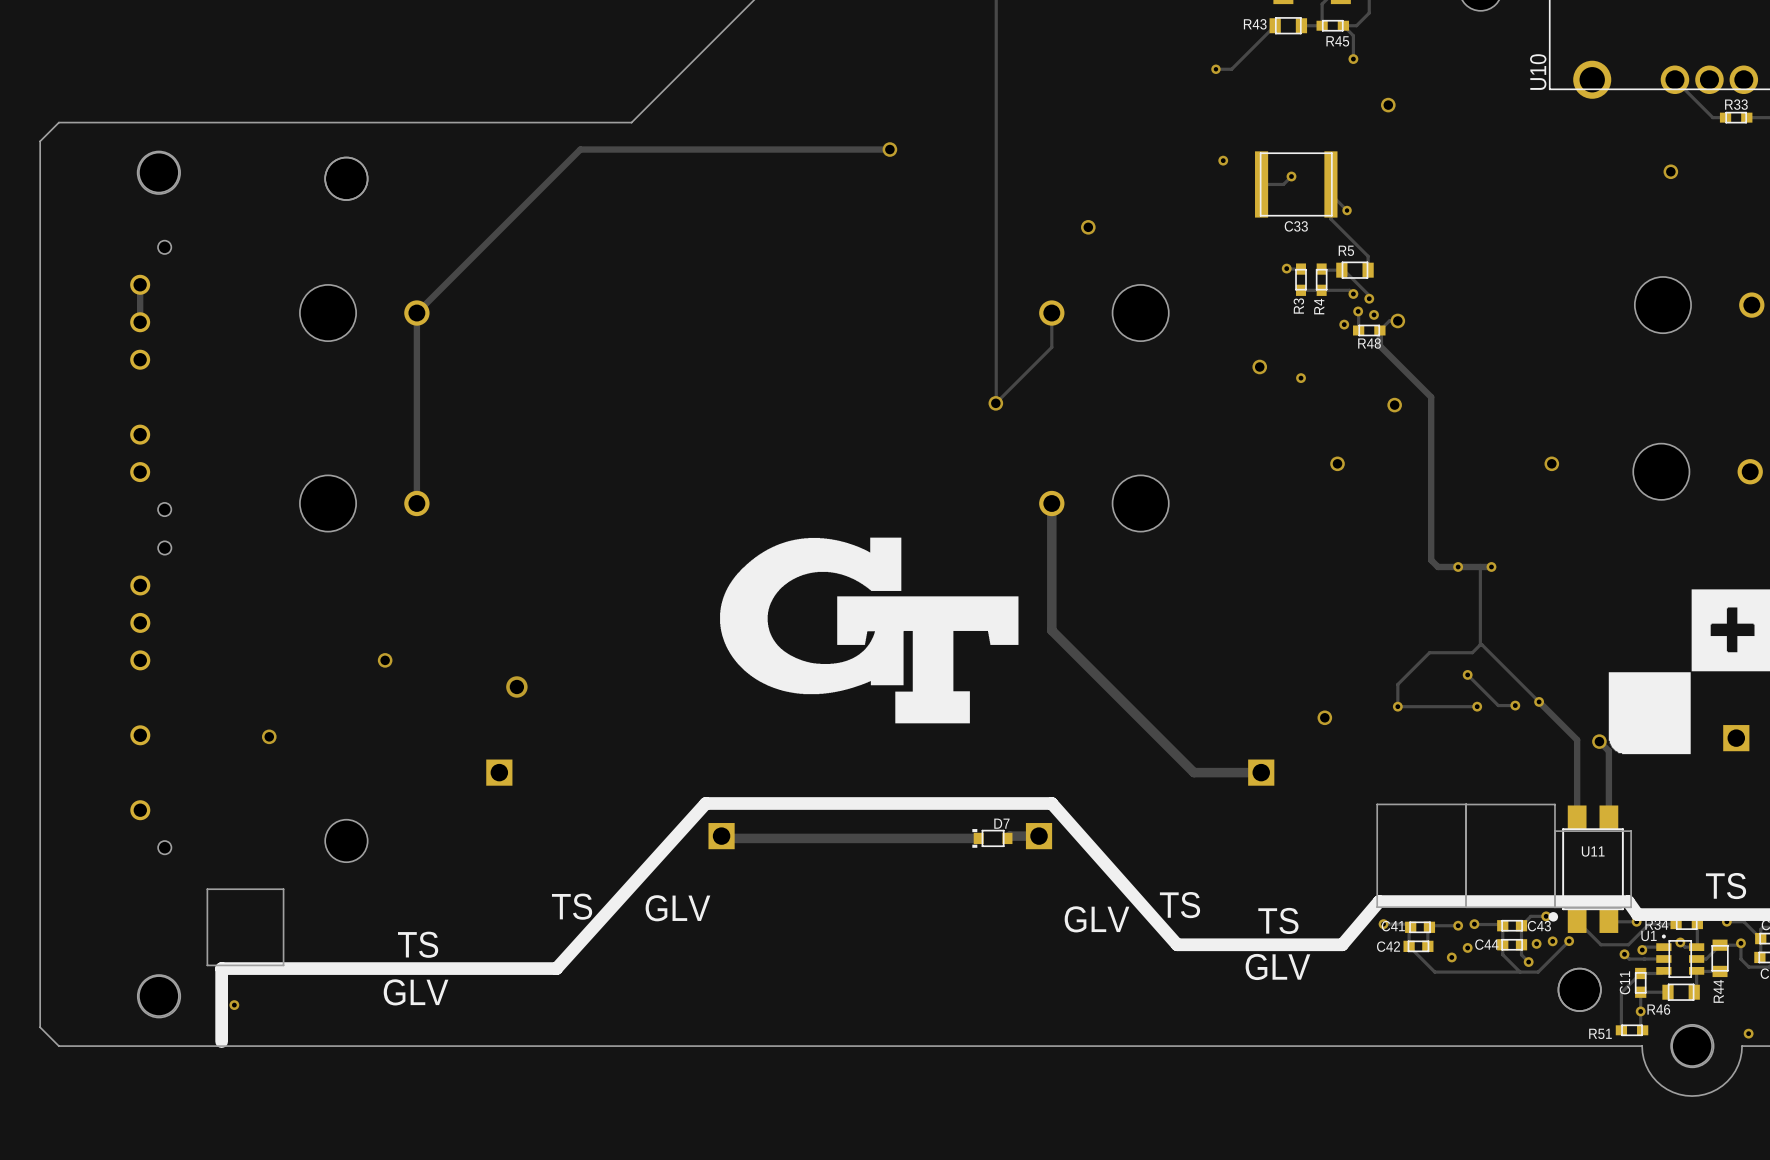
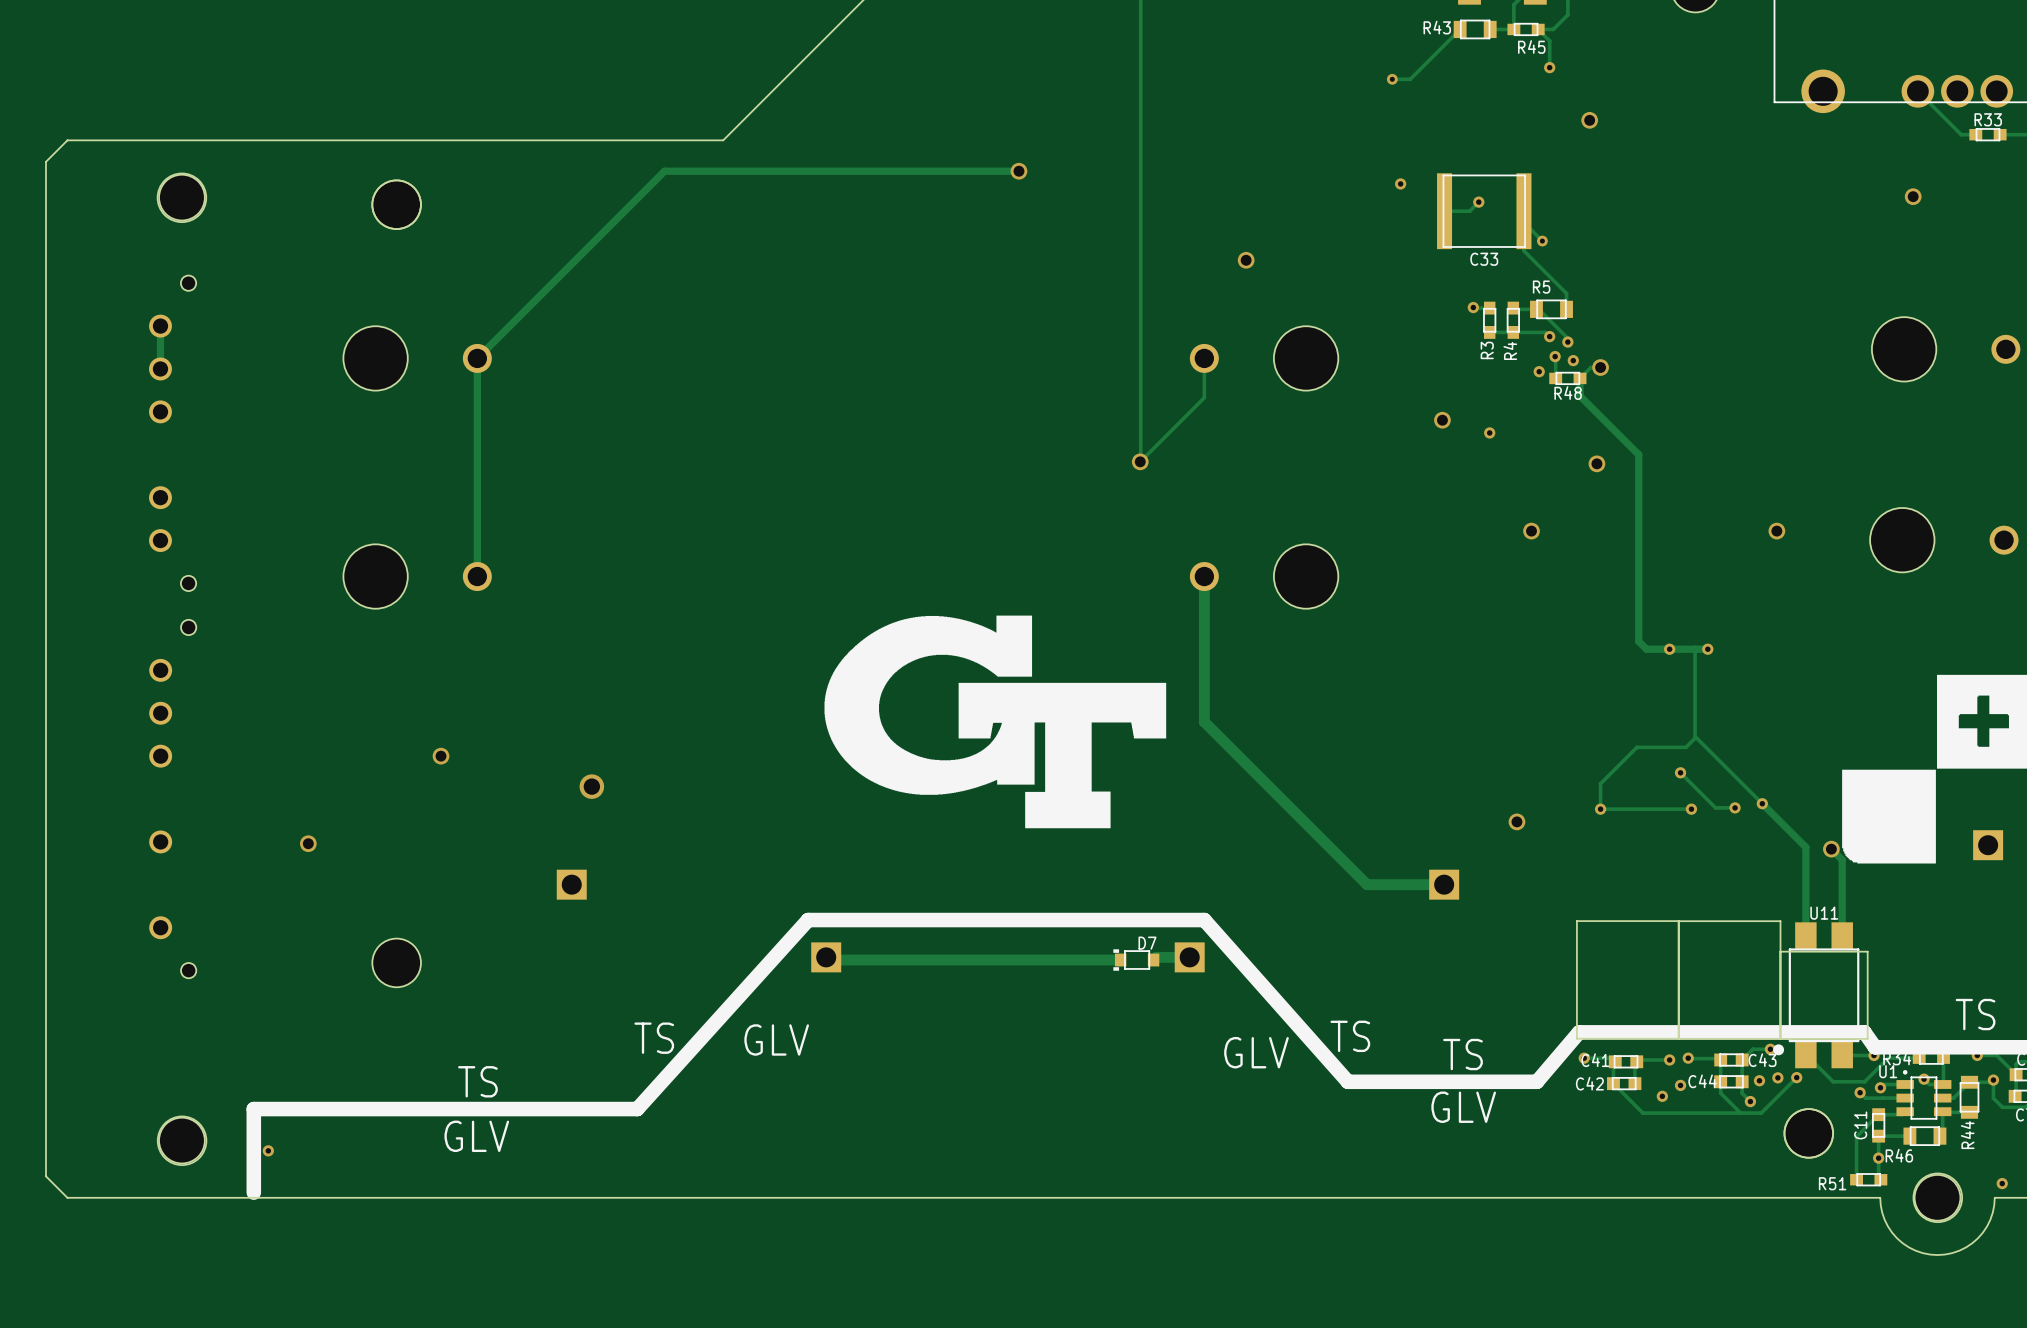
U10 name: U10 (1538, 72) -> none
U11 name position: U11 (1593, 851) -> U11 (1824, 913)
part: (245, 927) -> none

